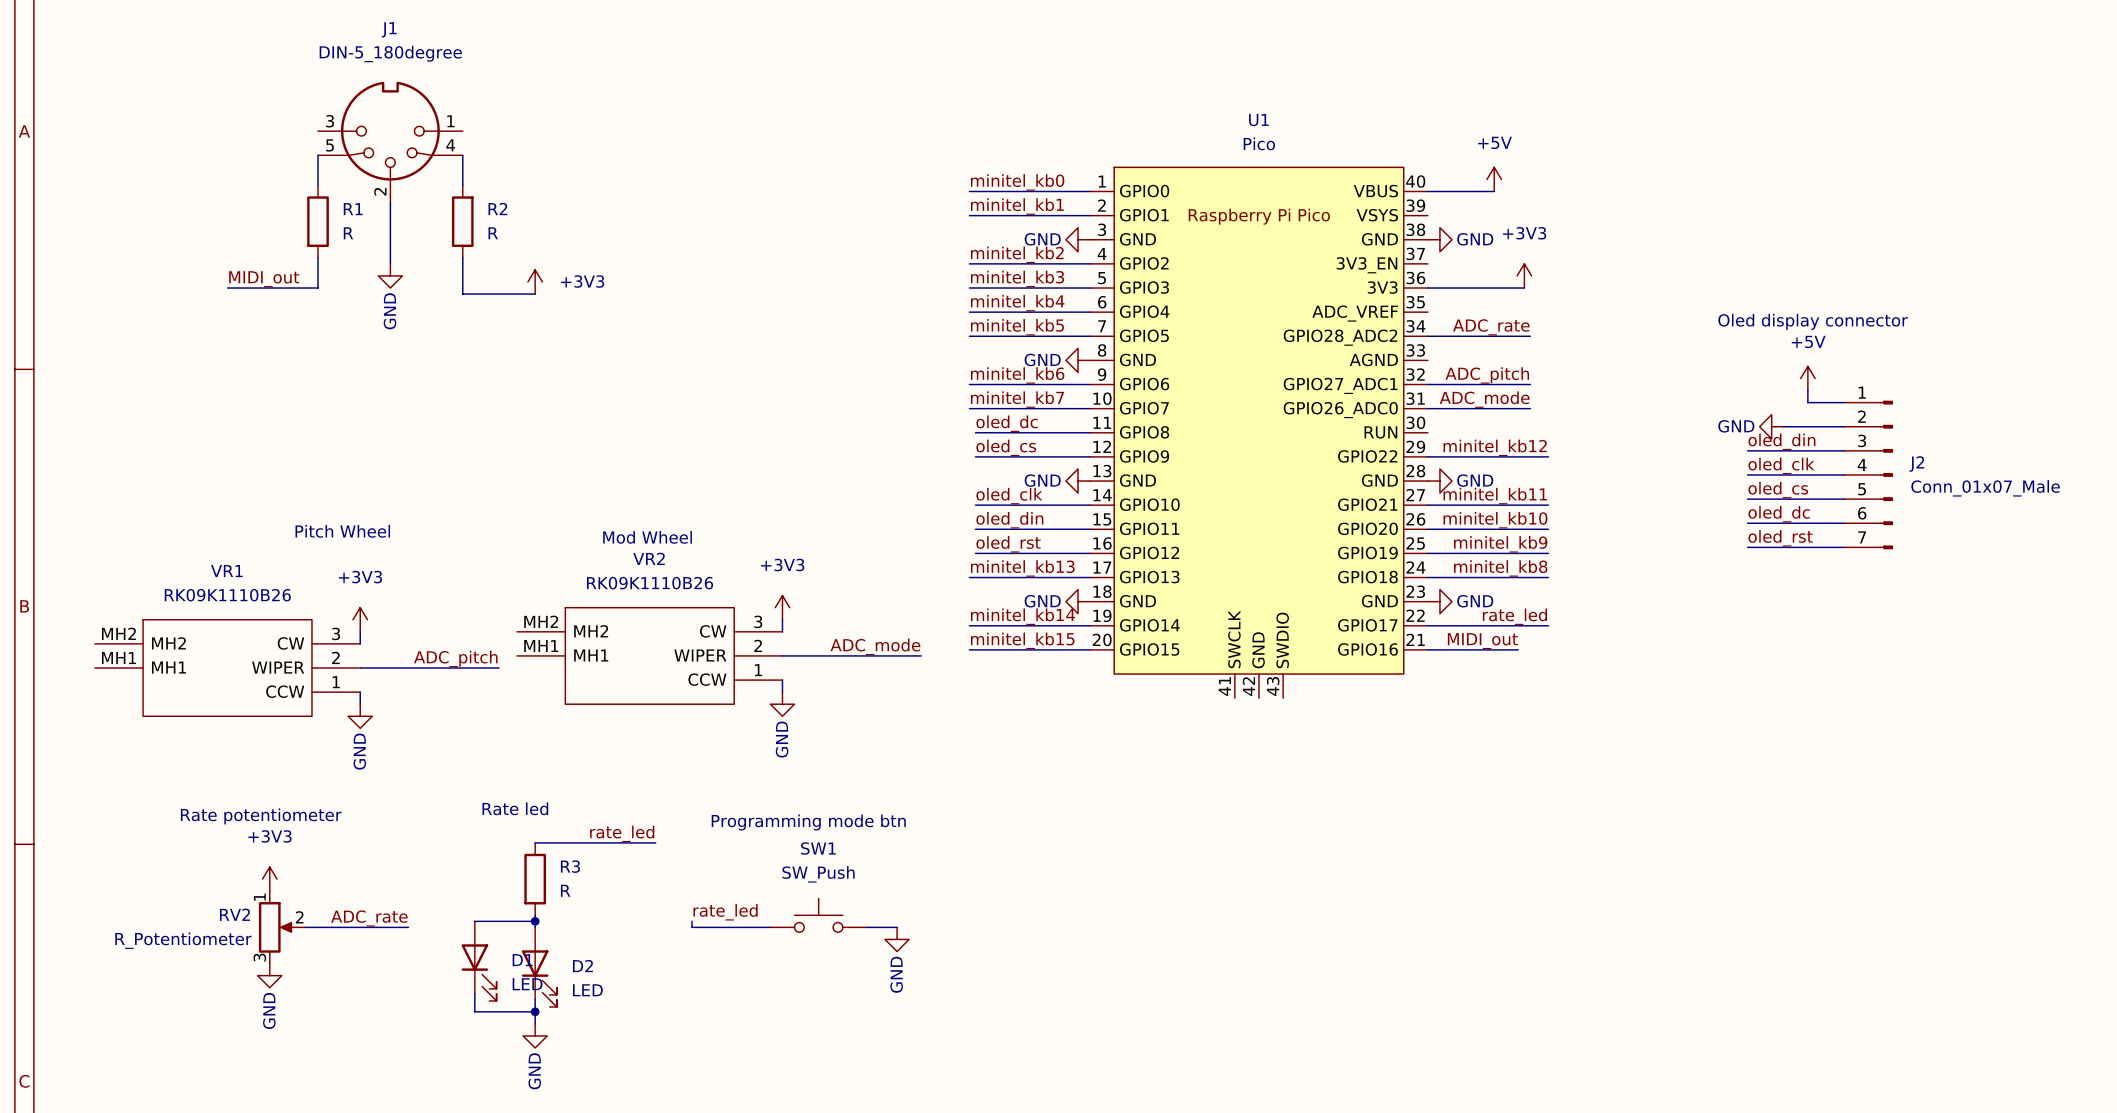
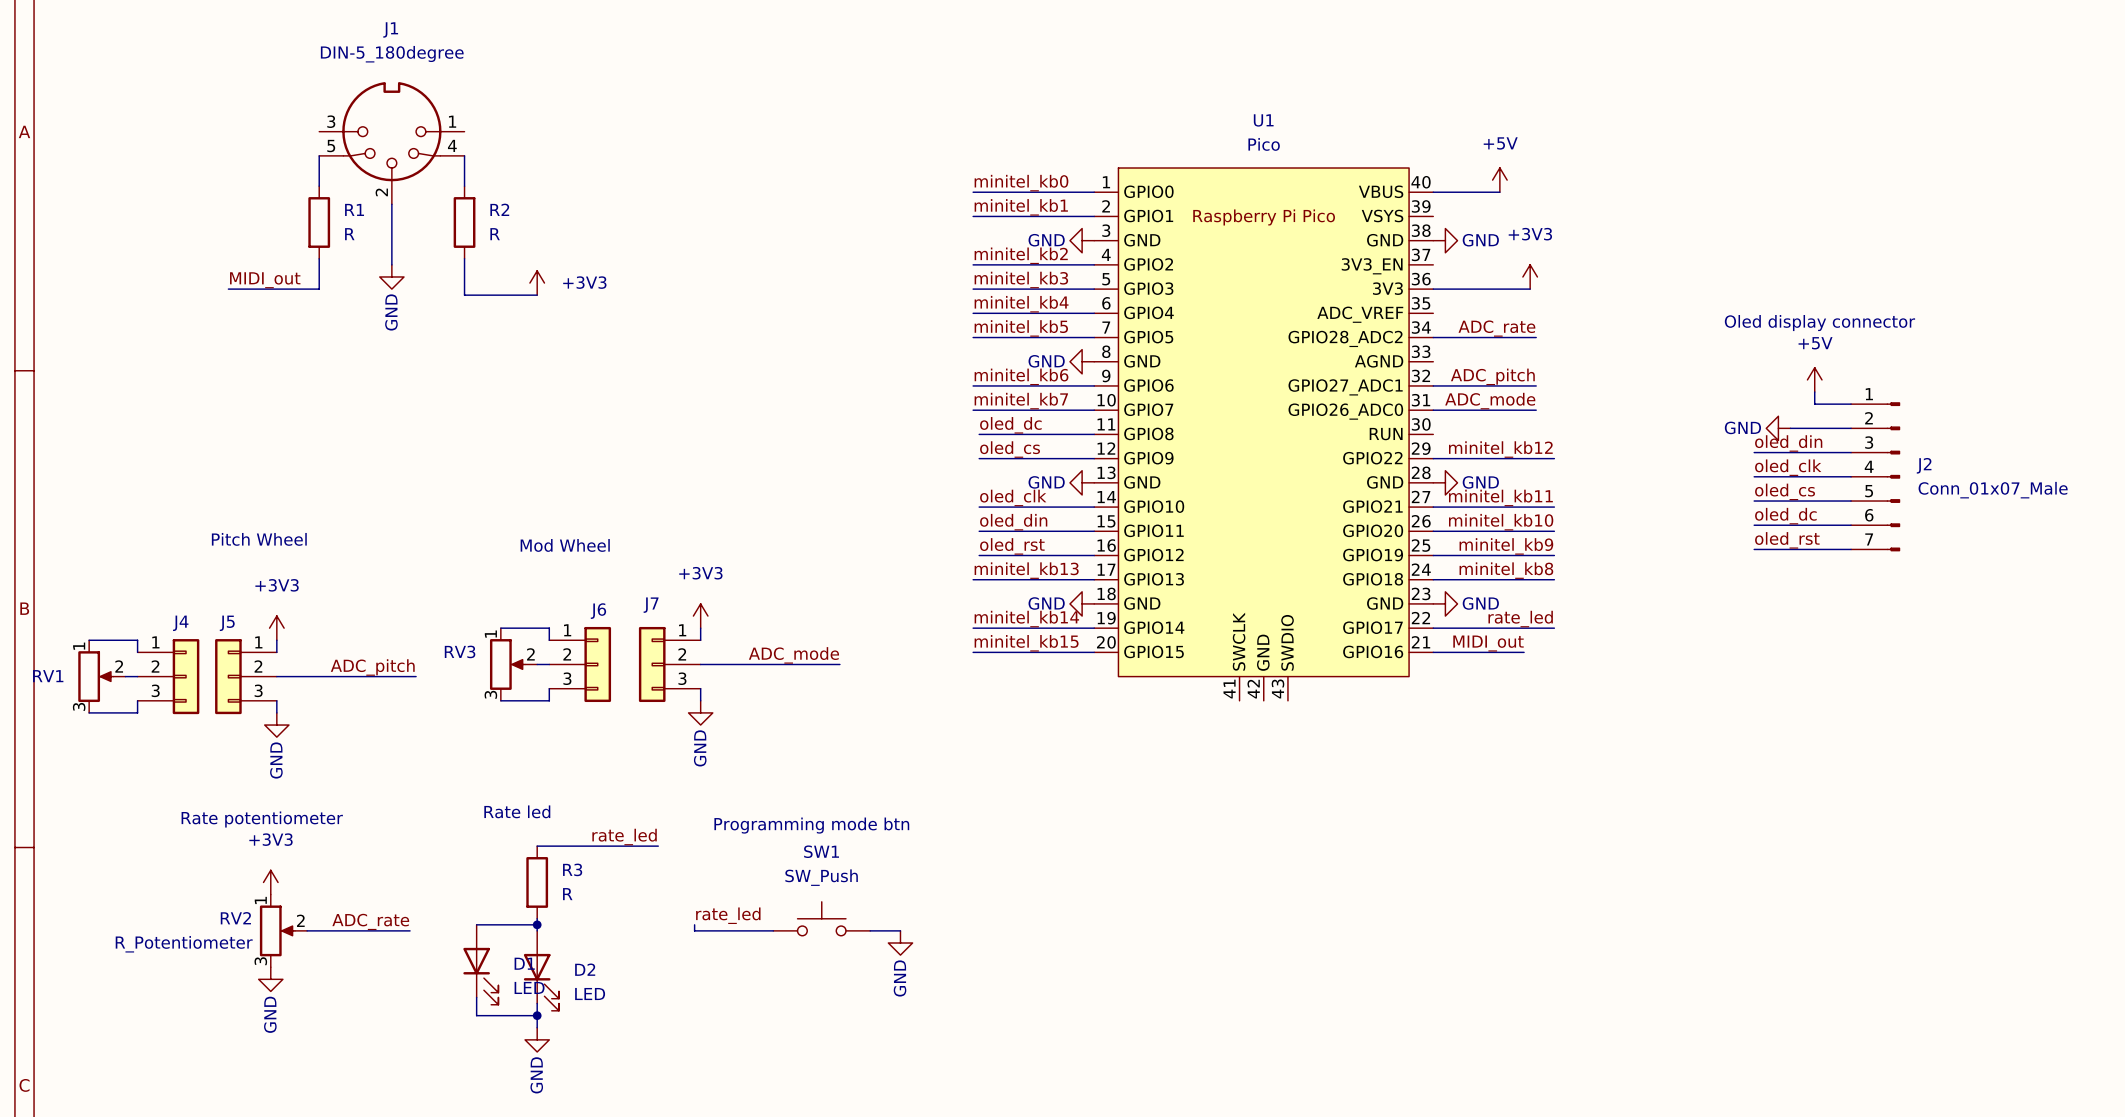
text position: Pitch Wheel (342, 531) -> Pitch Wheel (259, 539)
text position: Mod Wheel (647, 537) -> Mod Wheel (565, 545)
power symbol position: +3V3 (782, 607) -> +3V3 (700, 616)
power symbol position: +3V3 (360, 619) -> +3V3 (276, 628)
wire: (782, 619) (782, 631) -> (700, 628) (700, 640)
wire: none -> (500, 628) (549, 628) (549, 640)
wire: (360, 631) (360, 643) -> (276, 640) (276, 652)
wire: none -> (89, 640) (137, 640) (137, 652)
label position: ADC_mode (875, 646) -> ADC_mode (793, 655)
VR2: RK09K1110B26 (649, 655) -> none
wire: (782, 655) (921, 655) -> (700, 664) (839, 664)
label position: ADC_pitch (455, 658) -> ADC_pitch (372, 667)
RV3: none -> (513, 664)
wire: none -> (537, 664) (549, 664)
J6: none -> (580, 664)
J7: none -> (669, 664)
VR1: RK09K1110B26 (227, 668) -> none
wire: (360, 668) (498, 668) -> (276, 676) (416, 676)
RV1: none -> (101, 676)
wire: none -> (125, 676) (137, 676)
J4: none -> (168, 676)
J5: none -> (245, 676)
wire: (782, 680) (782, 692) -> (700, 688) (700, 700)
wire: none -> (549, 688) (549, 700) (500, 700)
wire: (360, 692) (360, 704) -> (276, 700) (276, 712)
wire: none -> (137, 700) (137, 712) (89, 712)
power symbol position: GND (782, 704) -> GND (700, 712)
power symbol position: GND (360, 716) -> GND (276, 725)

